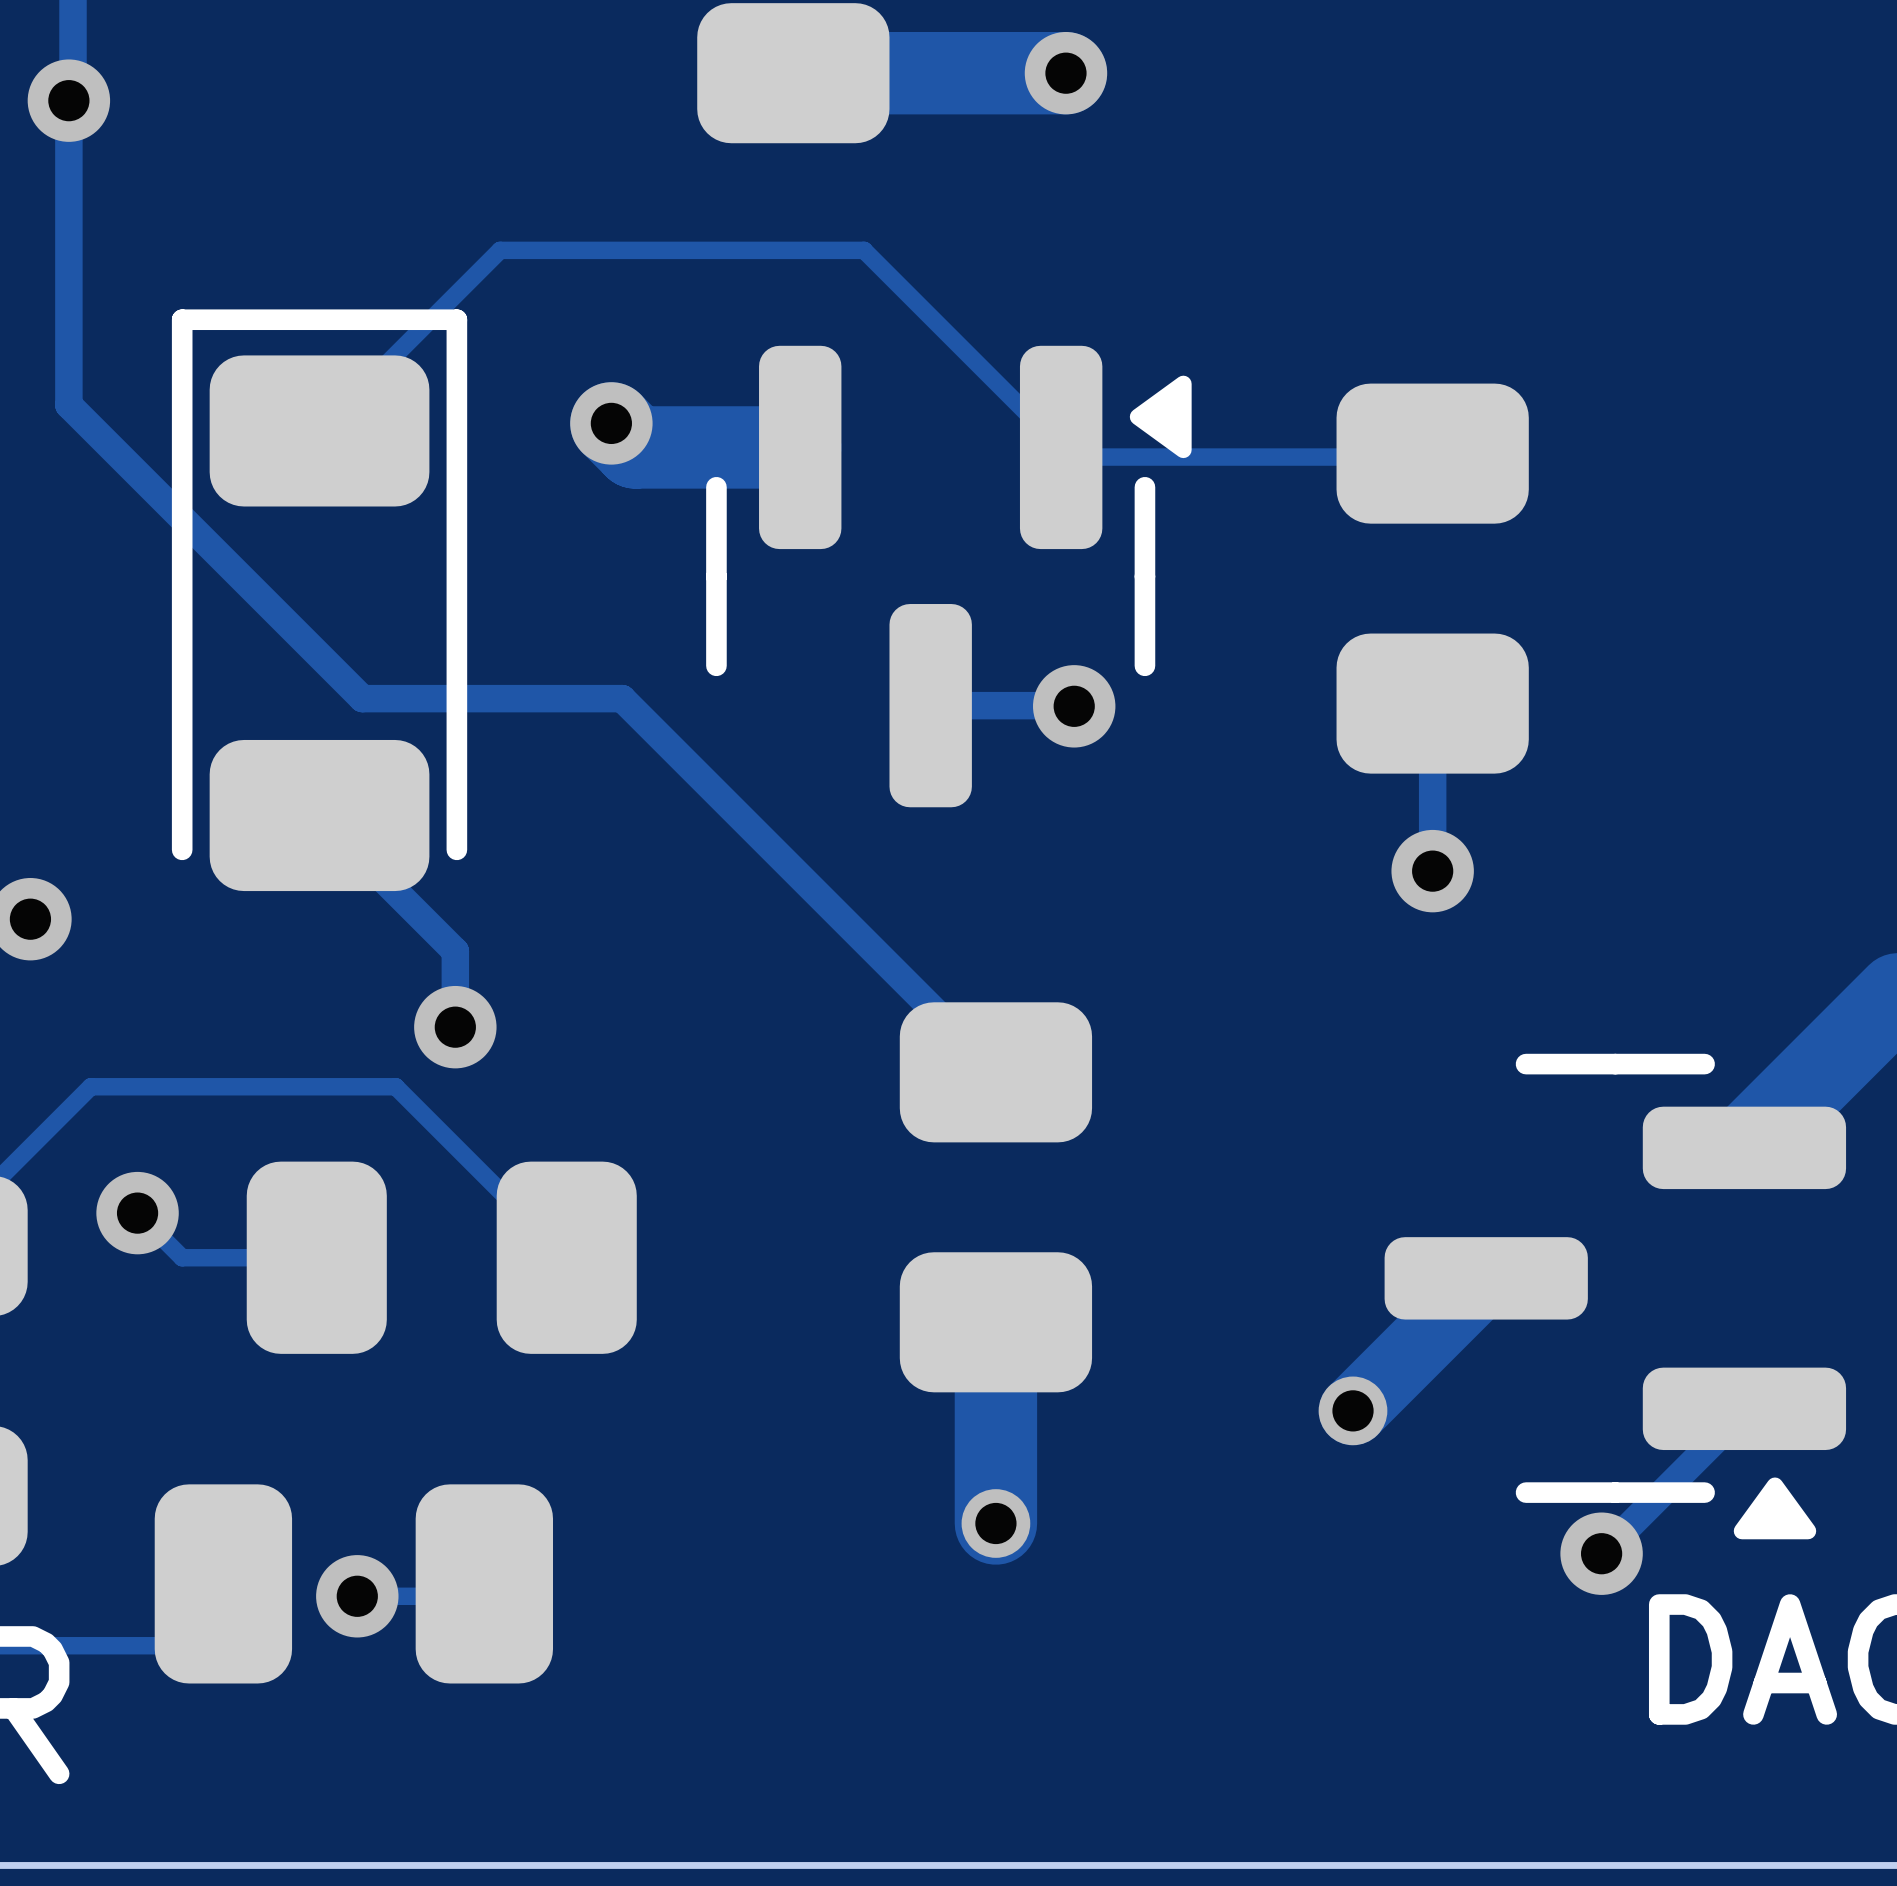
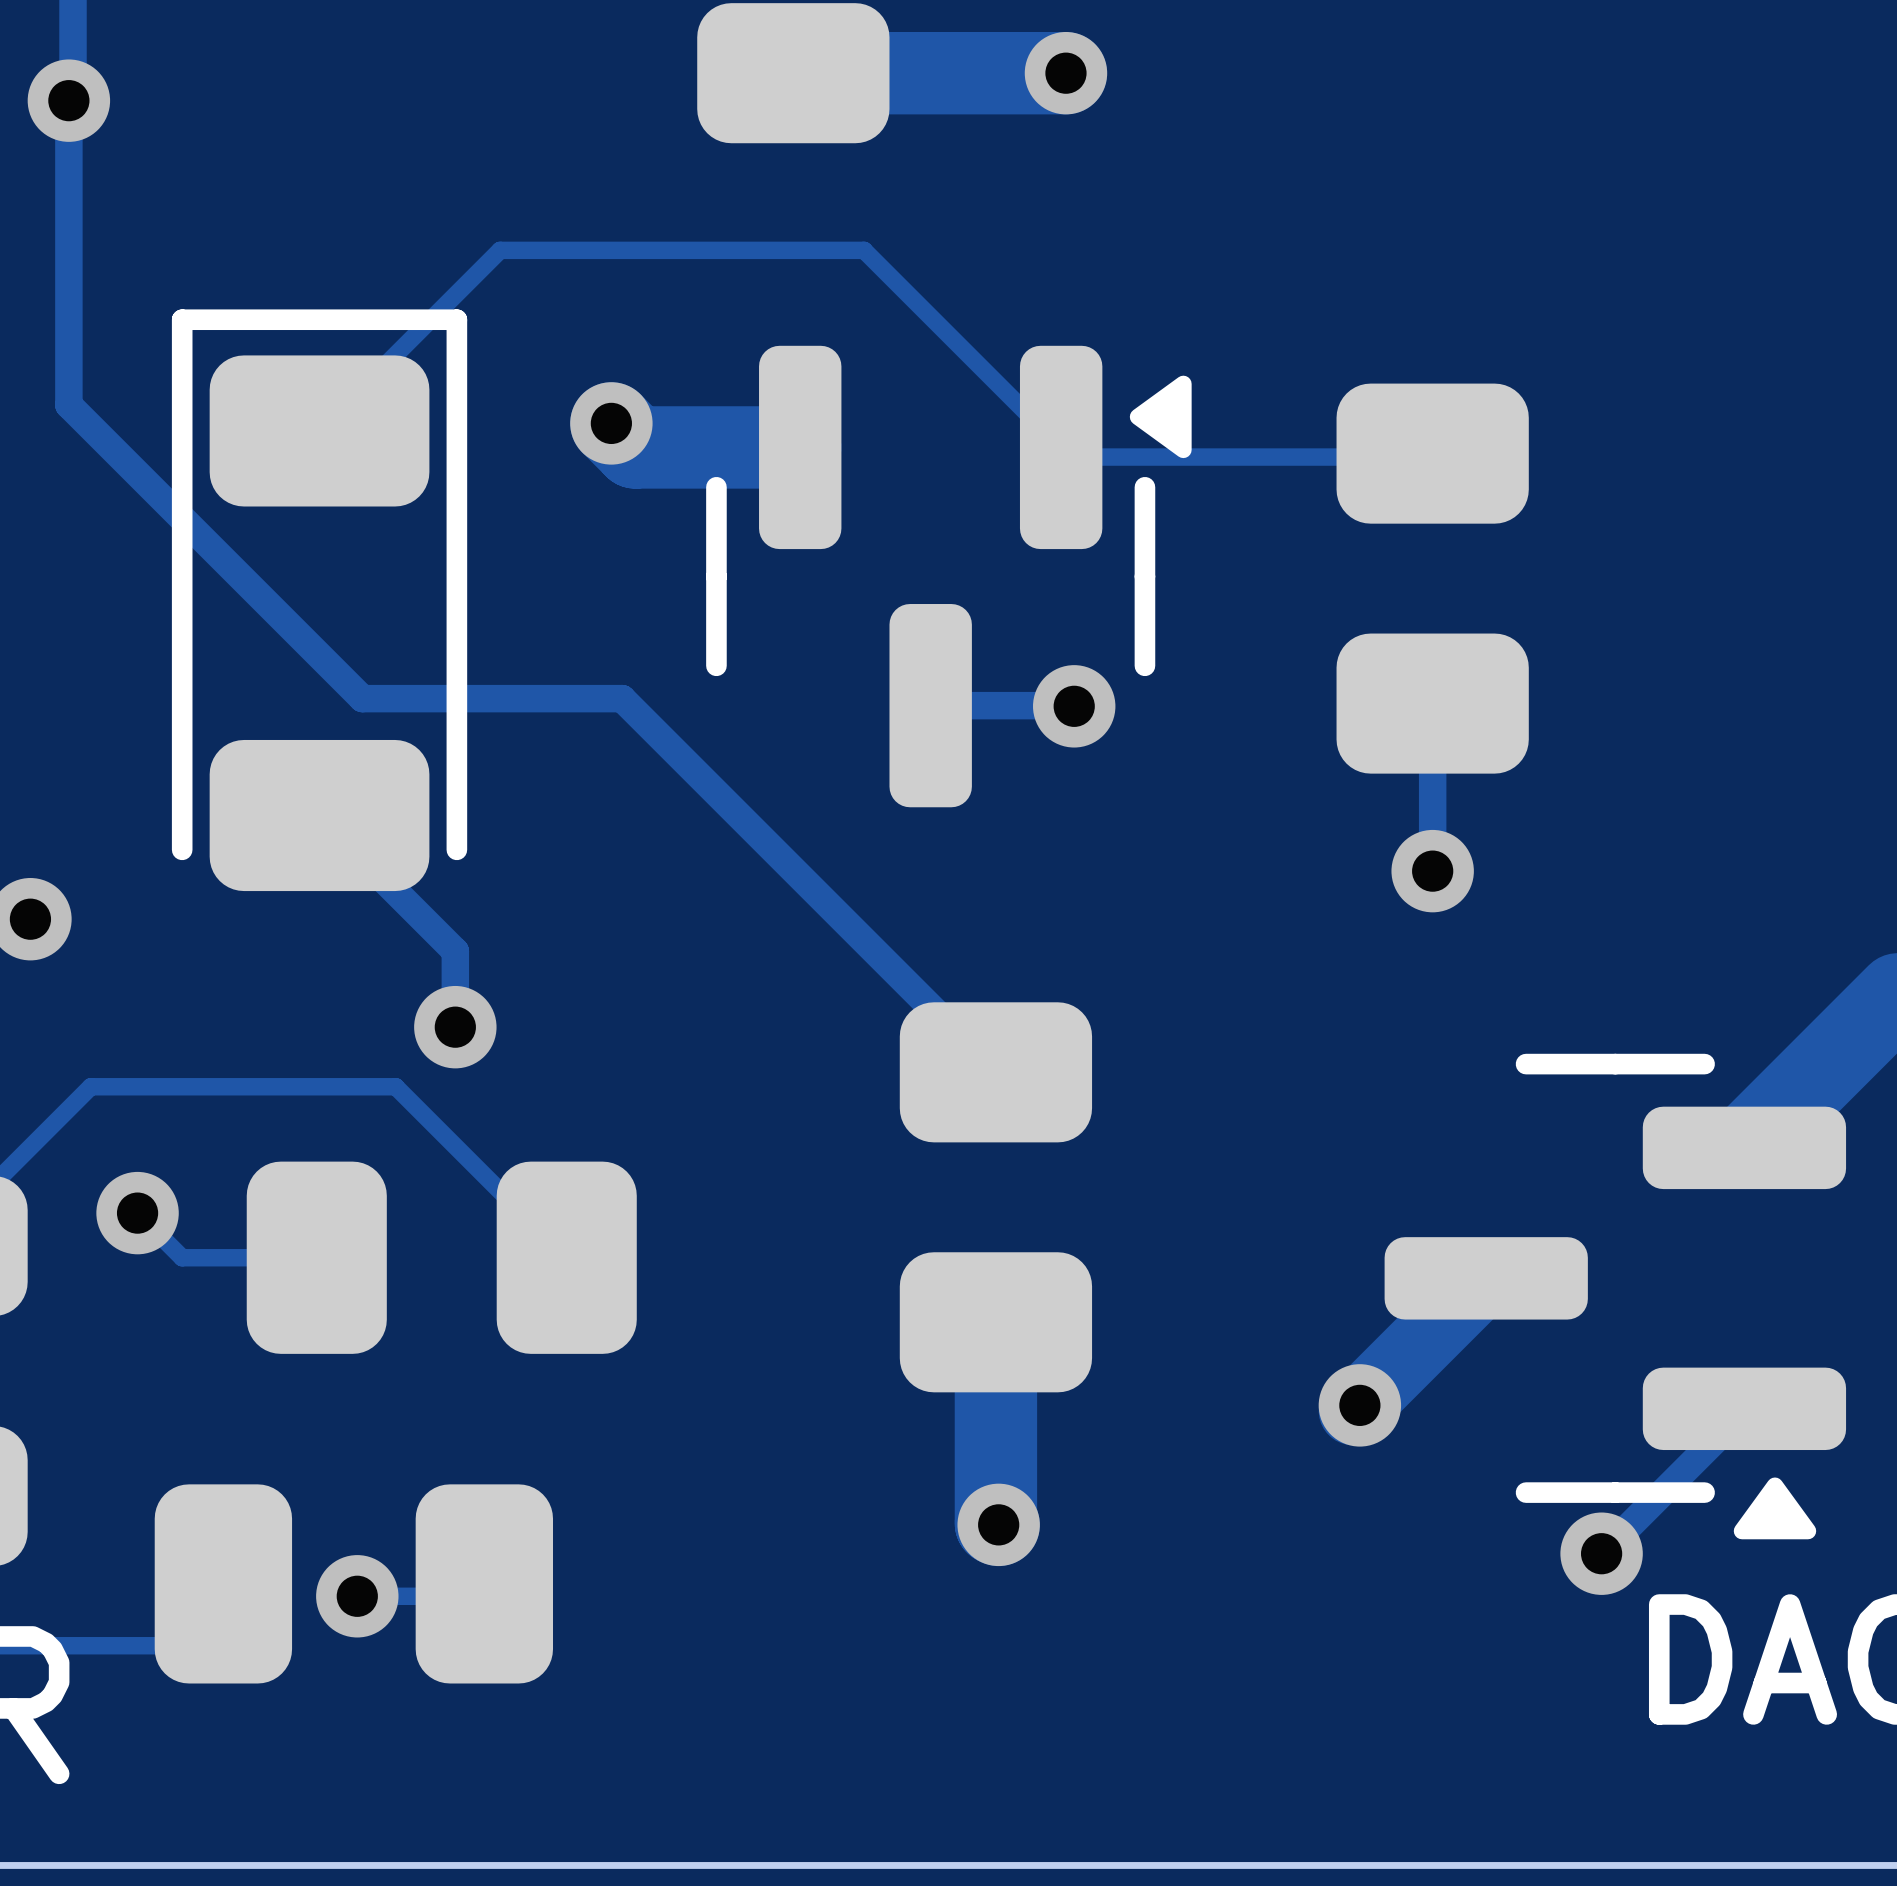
via size: [1318, 1376, 1388, 1446] -> [1318, 1364, 1402, 1447]
via size: [961, 1489, 1031, 1558] -> [957, 1483, 1040, 1567]

